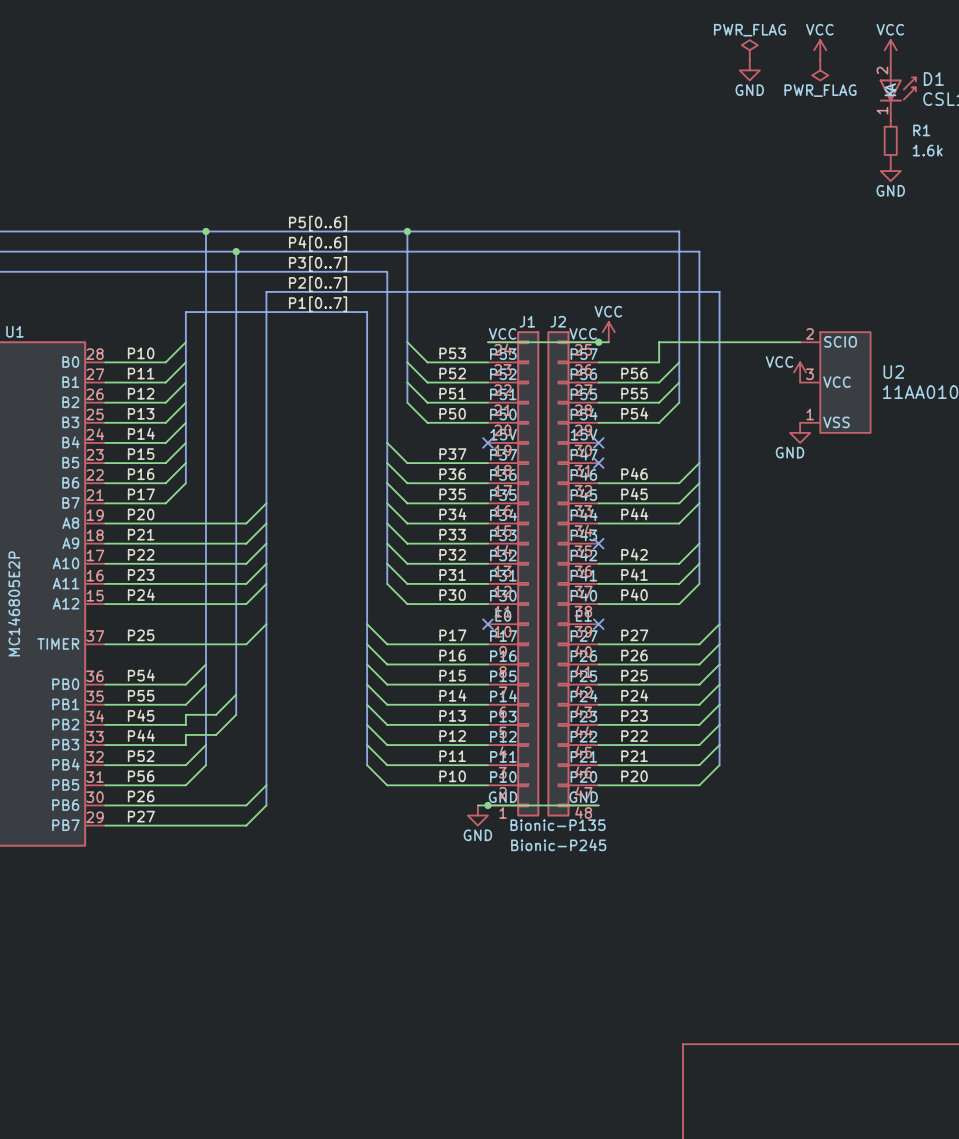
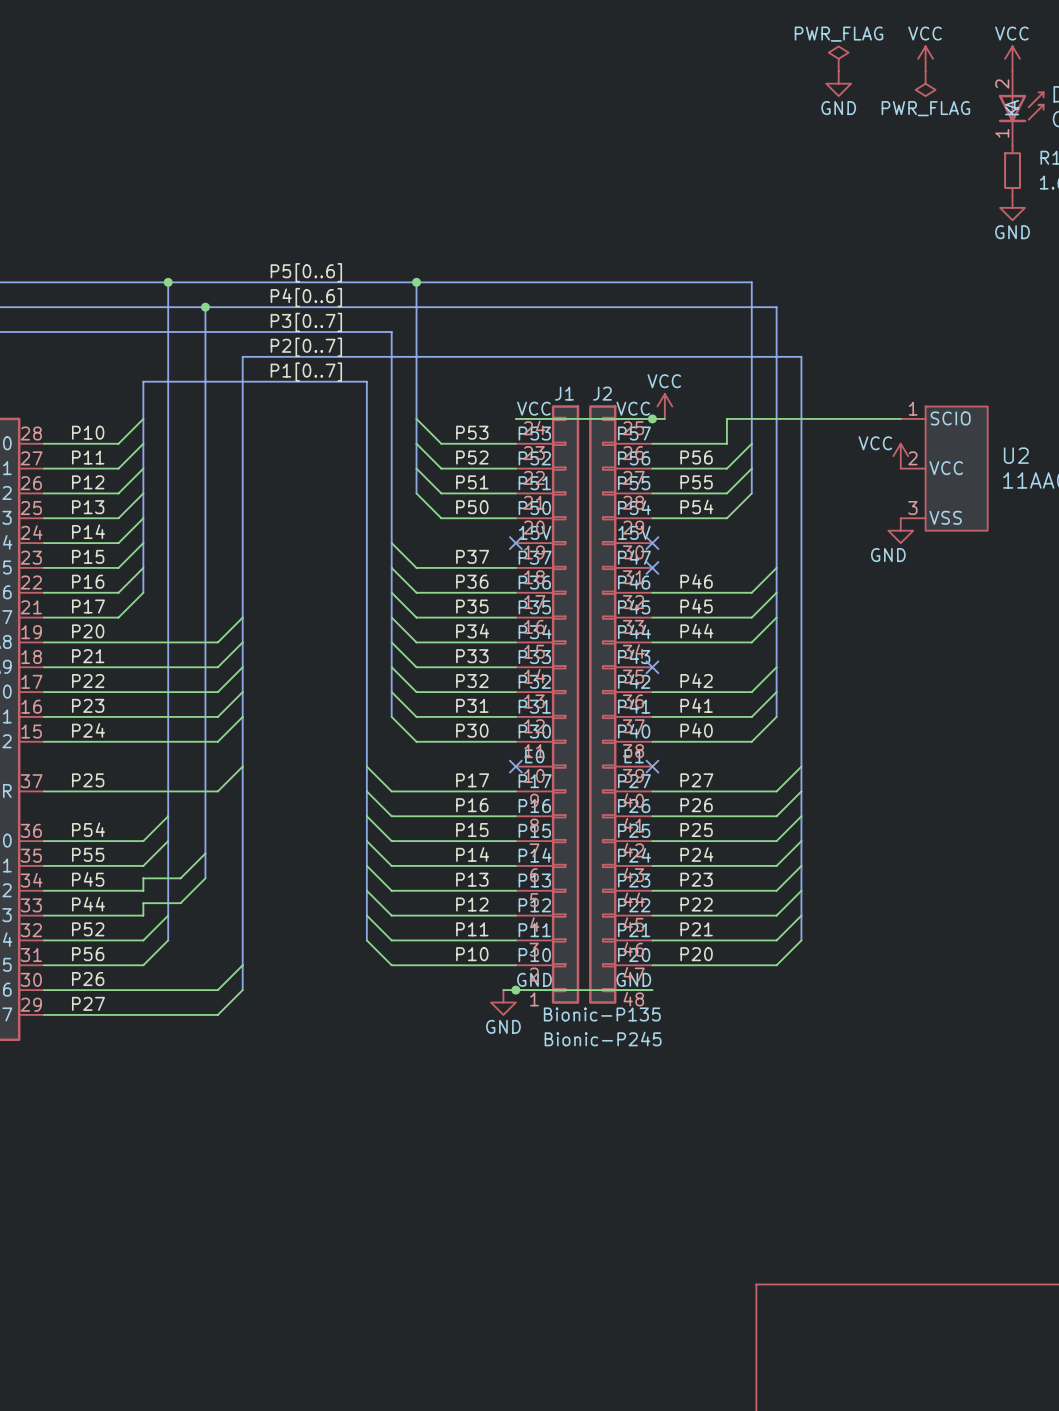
U2 pin number: 2 (809, 333) -> 1 (913, 408)
U2 pin number: 3 (809, 374) -> 2 (912, 458)
U2 pin number: 1 (810, 414) -> 3 (912, 508)

